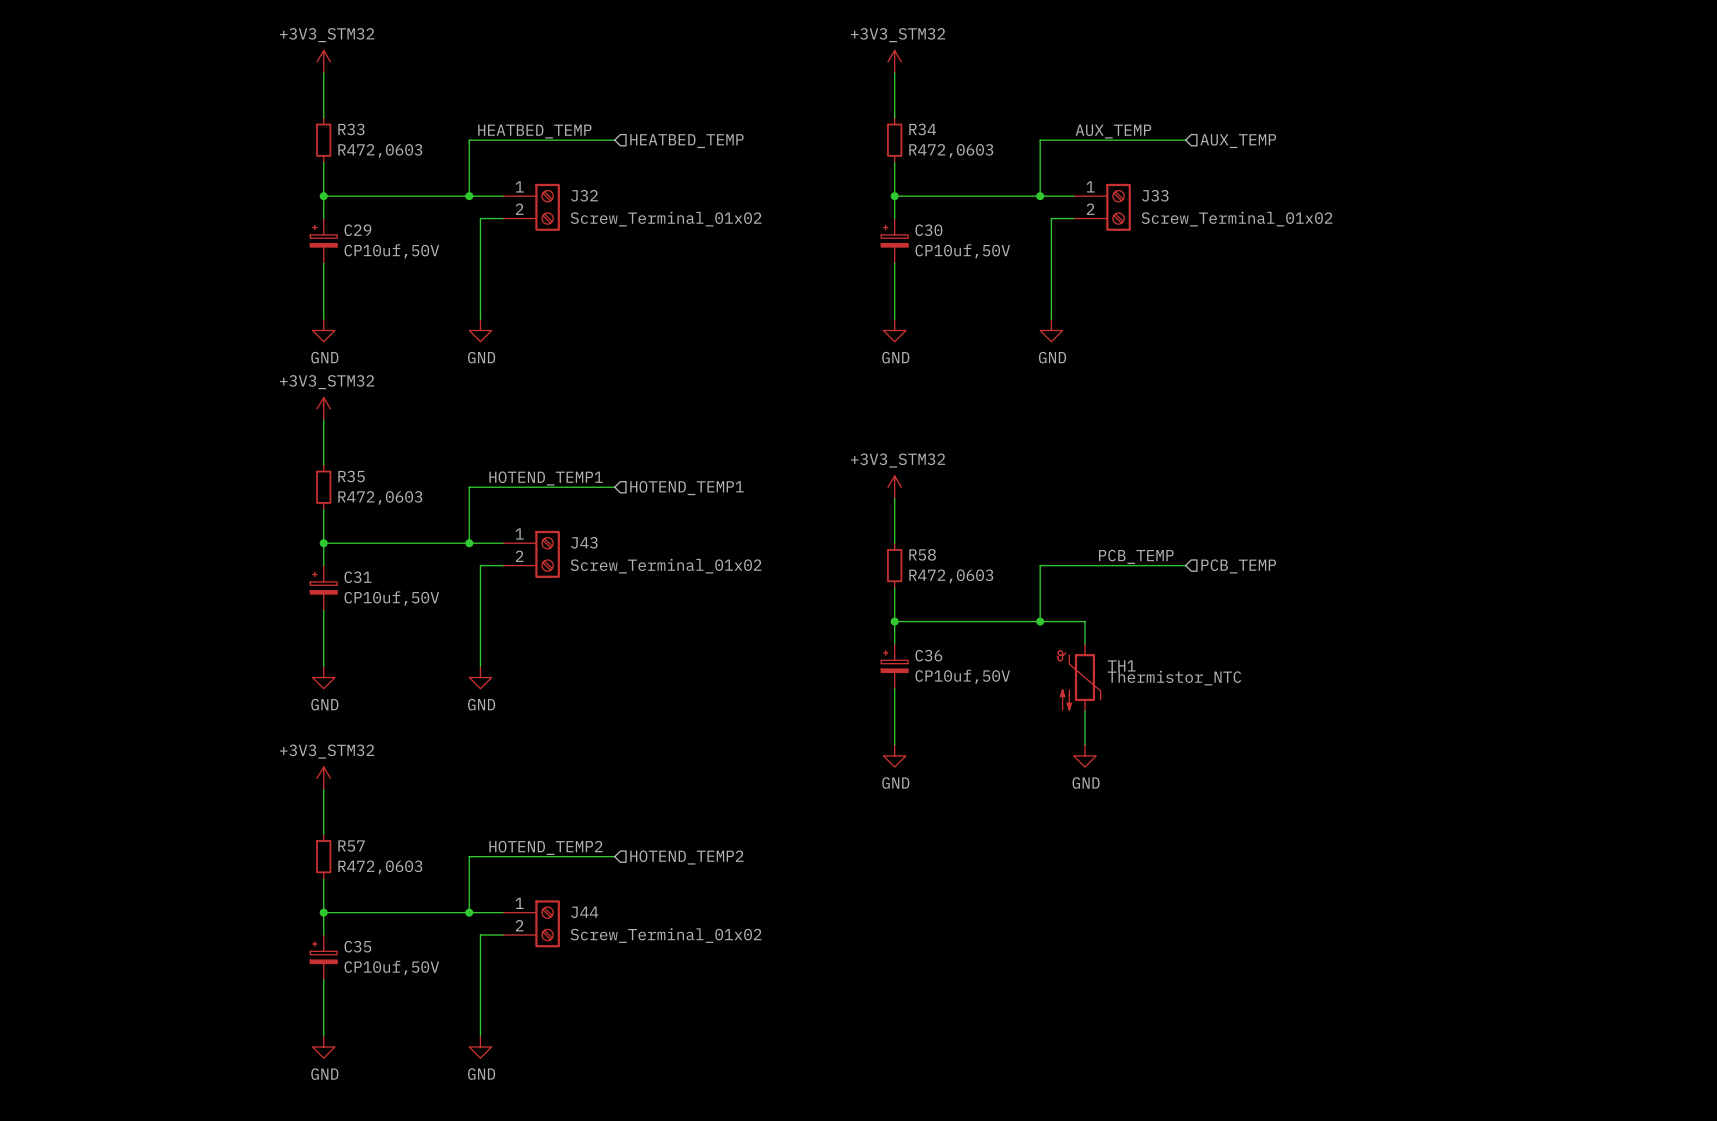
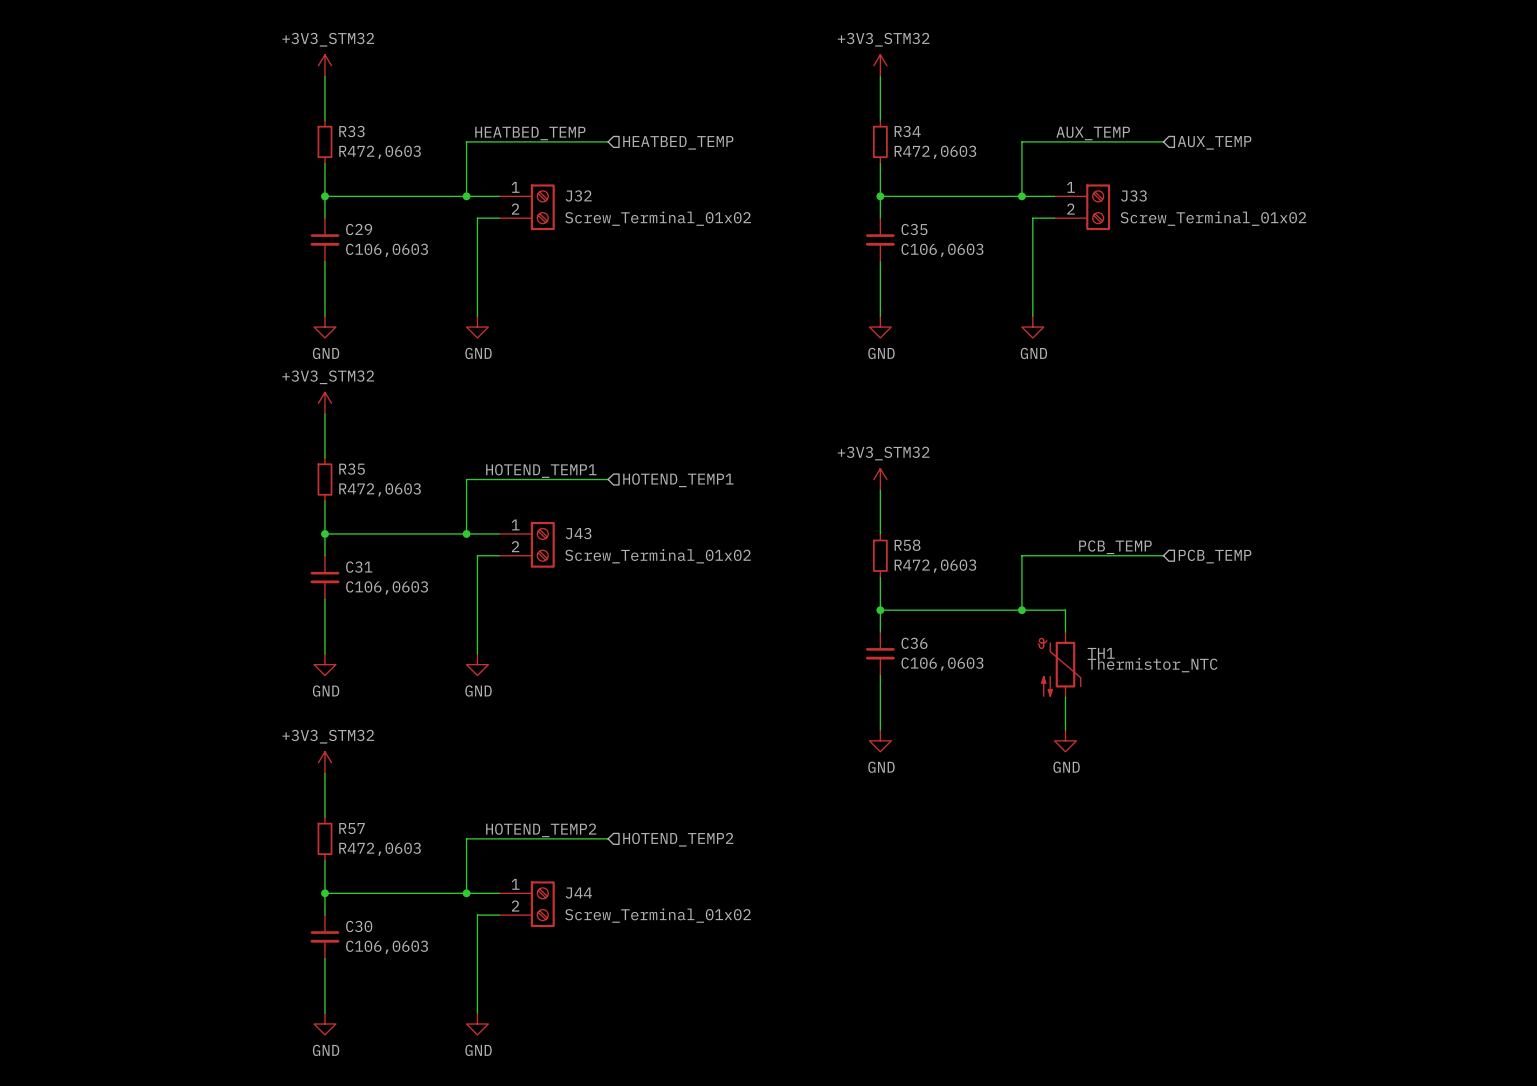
C29 symbol: [310, 218, 338, 264] -> [310, 218, 340, 262]
C30 symbol: [881, 218, 909, 264] -> [310, 915, 340, 959]
C29 value: CP10uf,50V (391, 251) -> C106,0603 (387, 250)
C30 value: CP10uf,50V (962, 251) -> C106,0603 (387, 947)
C31 symbol: [310, 565, 338, 611] -> [310, 555, 340, 600]
C31 value: CP10uf,50V (391, 598) -> C106,0603 (387, 587)
C36 symbol: [881, 643, 909, 689] -> [865, 631, 895, 676]
C36 value: CP10uf,50V (962, 676) -> C106,0603 (942, 664)
C35 symbol: [310, 935, 338, 980] -> [865, 218, 895, 262]
C35 value: CP10uf,50V (391, 967) -> C106,0603 (942, 250)

